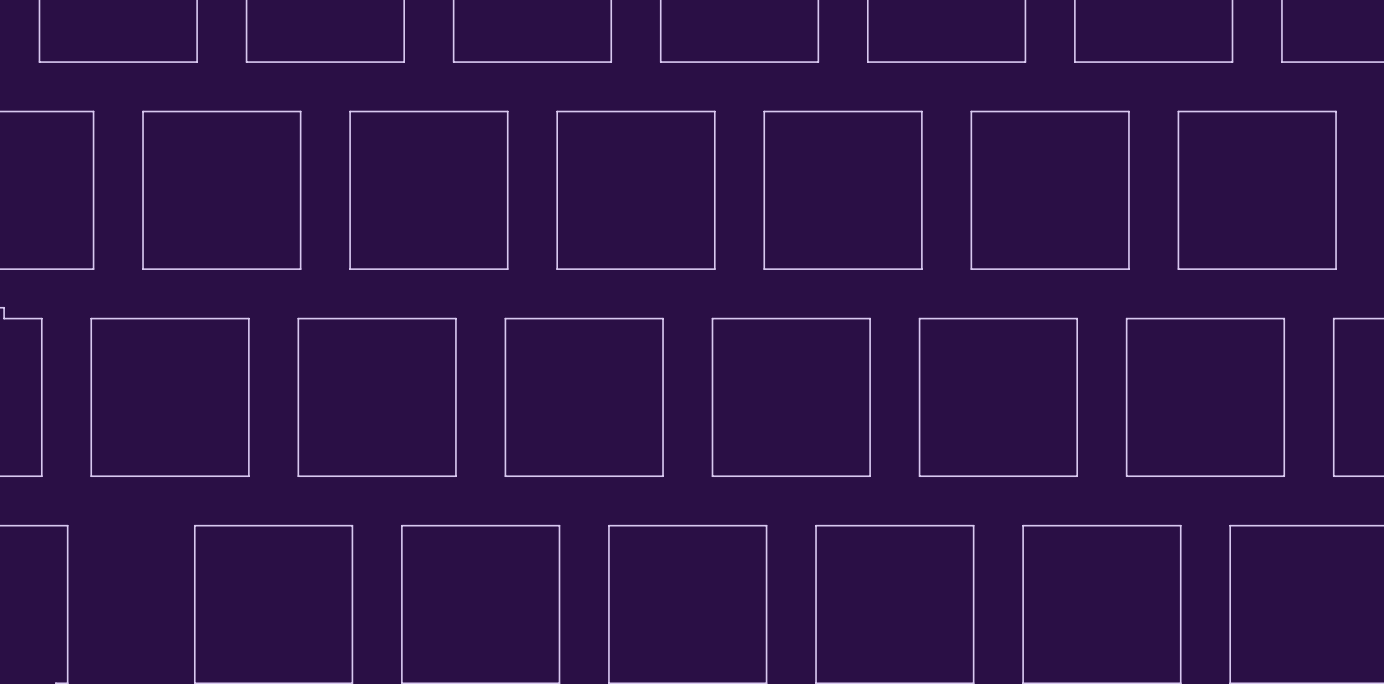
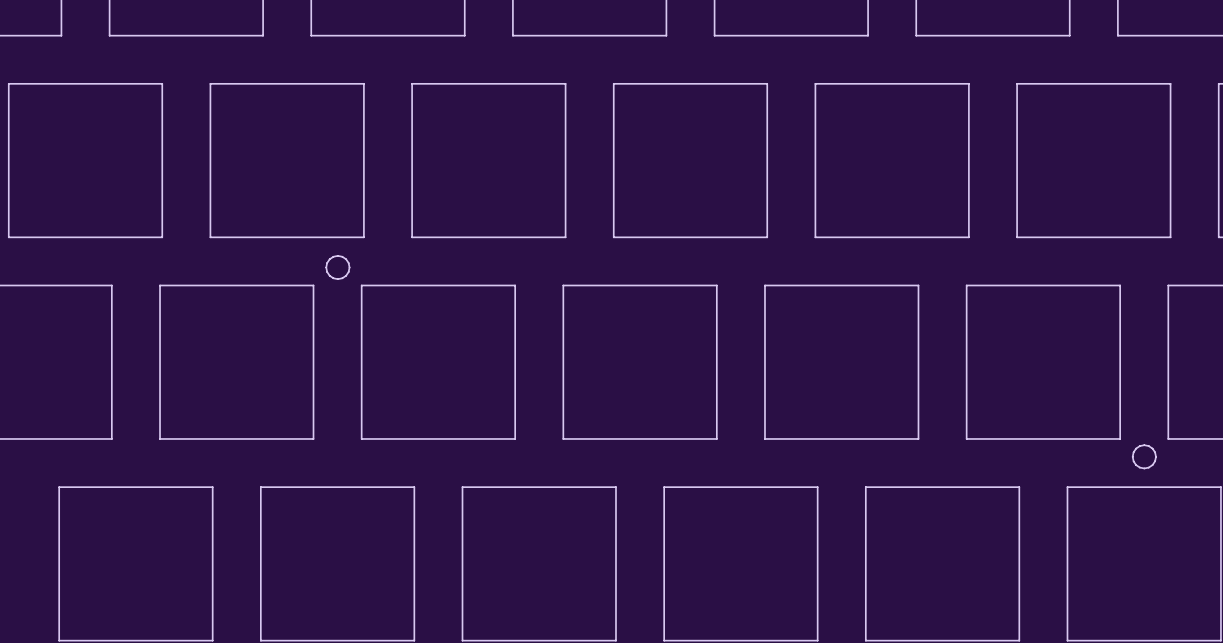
board edge: none -> (337, 255) (346, 259) (349, 267) (346, 275) (337, 279) (329, 275) (326, 267) (329, 259) (337, 255)
board edge: none -> (1144, 445) (1136, 448) (1132, 456) (1136, 465) (1144, 468) (1152, 465) (1155, 456) (1152, 448) (1144, 445)

